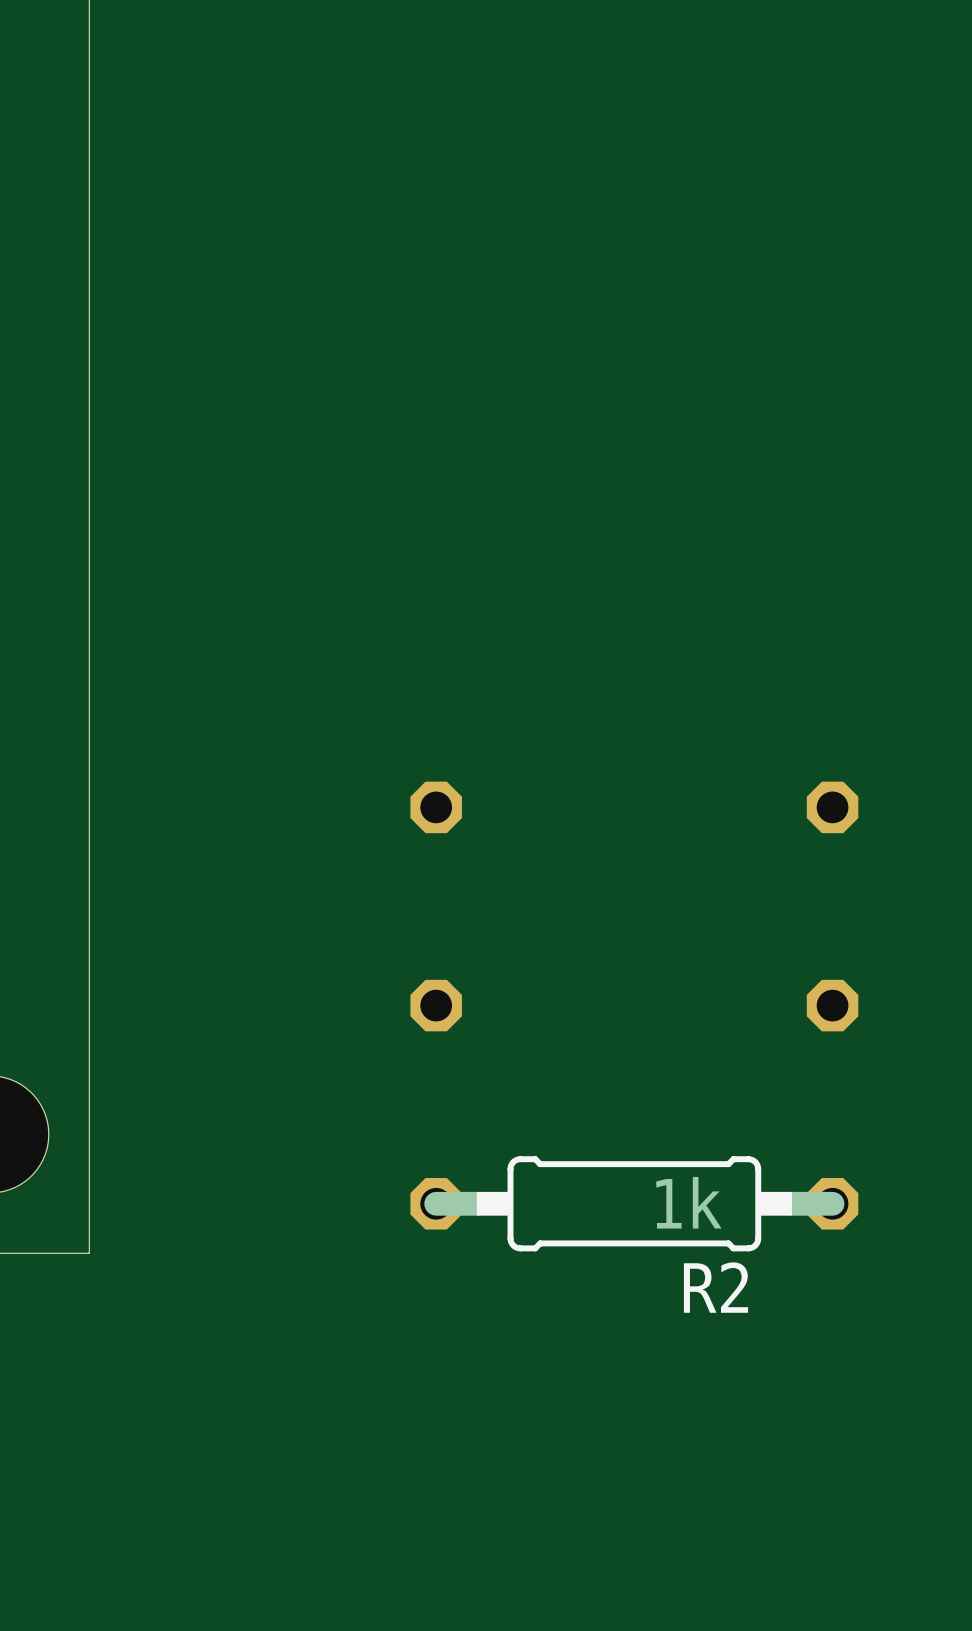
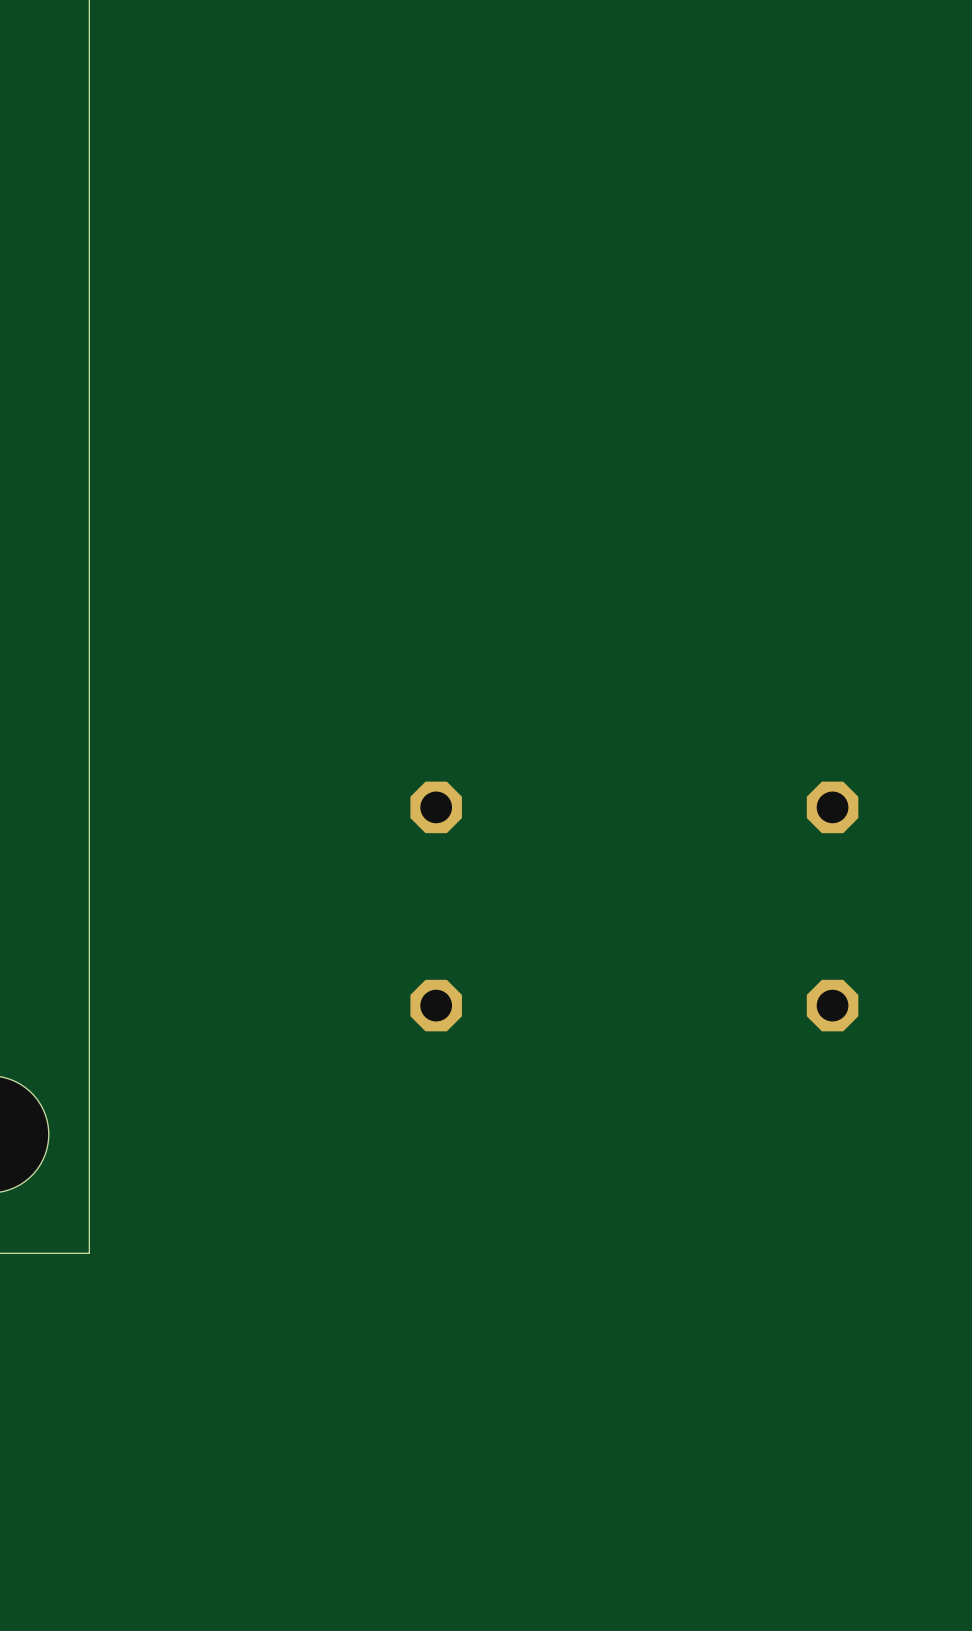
R2: 1k (634, 1203) -> none

